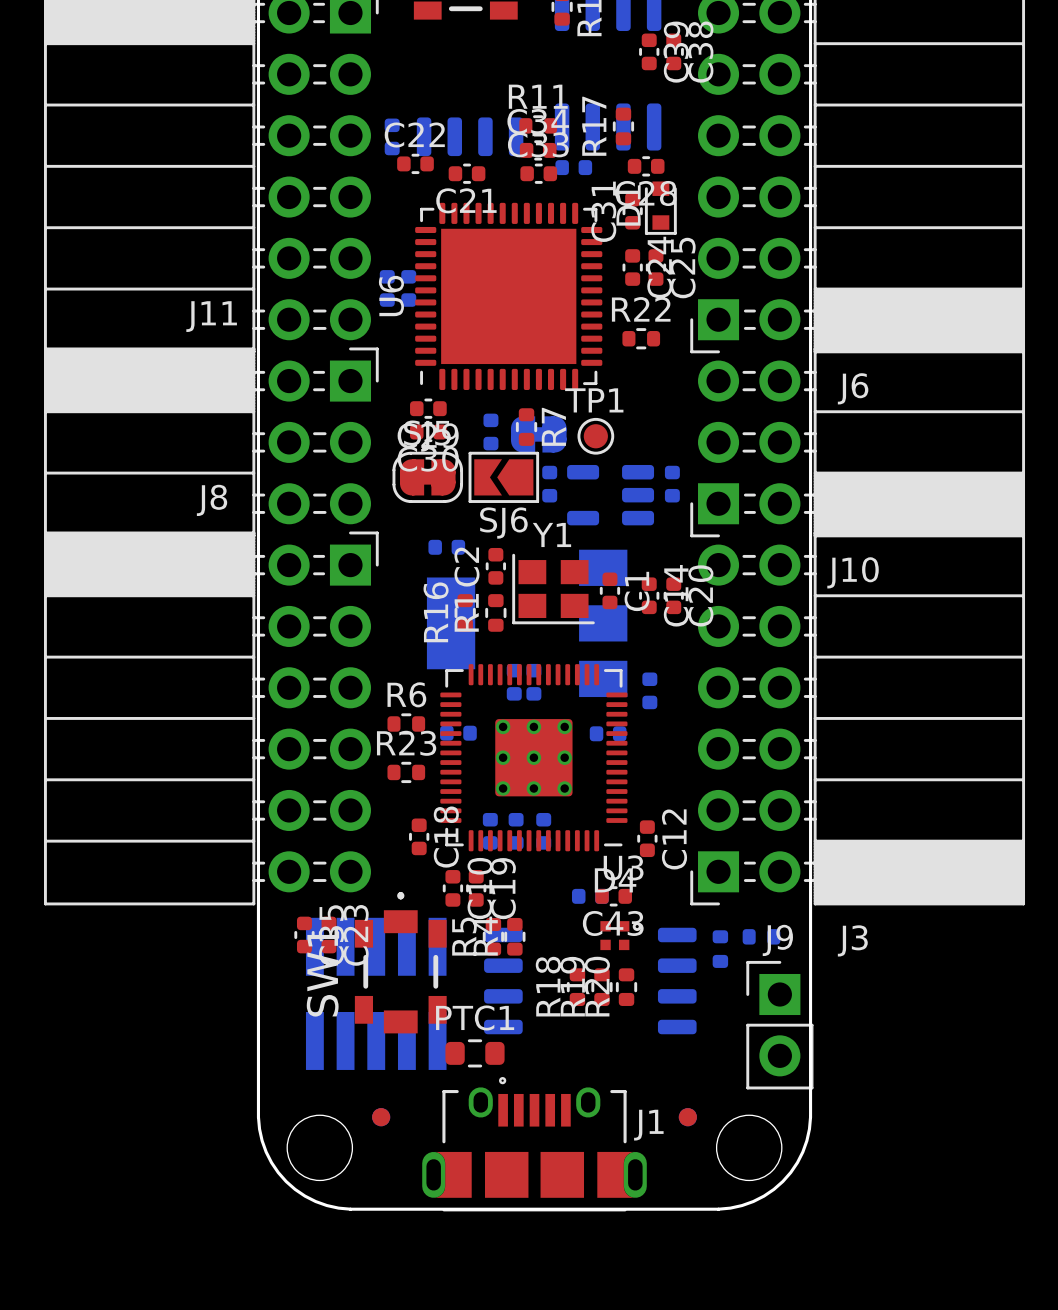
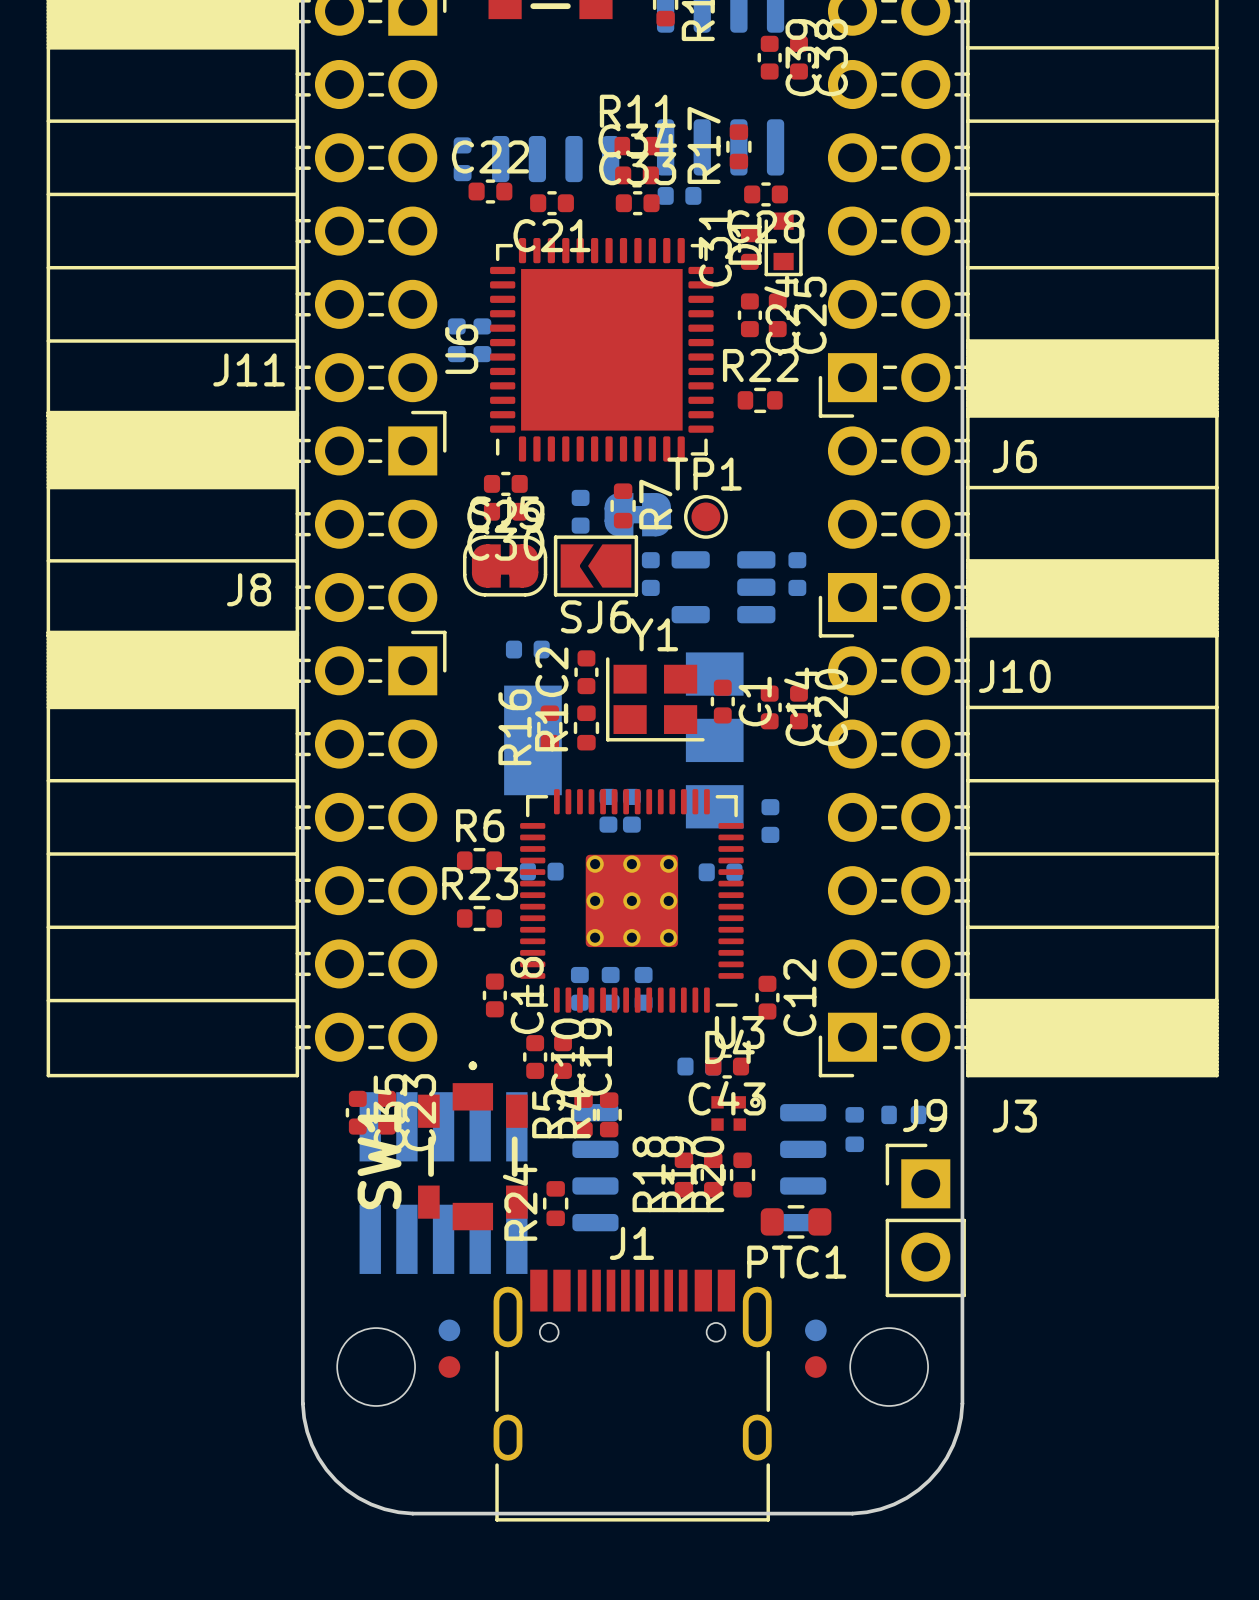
R24: none -> (555, 1203)
PTC1 name position: PTC1 (475, 1017) -> PTC1 (796, 1262)
PTC1 position: (475, 1053) -> (796, 1221)
J1 footprint: [422, 1077, 647, 1212] -> [493, 1269, 772, 1522]
board edge: (258, 1117) (262, 1140) (266, 1152) (278, 1172) (286, 1181) (305, 1196) (315, 1201) (326, 1205) (350, 1209) (730, 1208) (742, 1205) (764, 1196) (782, 1181) (797, 1162) (802, 1152) (809, 1129) (810, 1117) -> (302, 1330) (304, 1417) (312, 1445) (318, 1457) (335, 1480) (358, 1497) (384, 1509) (412, 1513) (852, 1513) (880, 1509) (906, 1497) (929, 1480) (946, 1457) (953, 1445) (958, 1431) (962, 1403) (962, 1330)
part position: (381, 1117) -> (449, 1367)
part position: (687, 1117) -> (815, 1367)
J1 name position: J1 (648, 1125) -> J1 (631, 1243)

